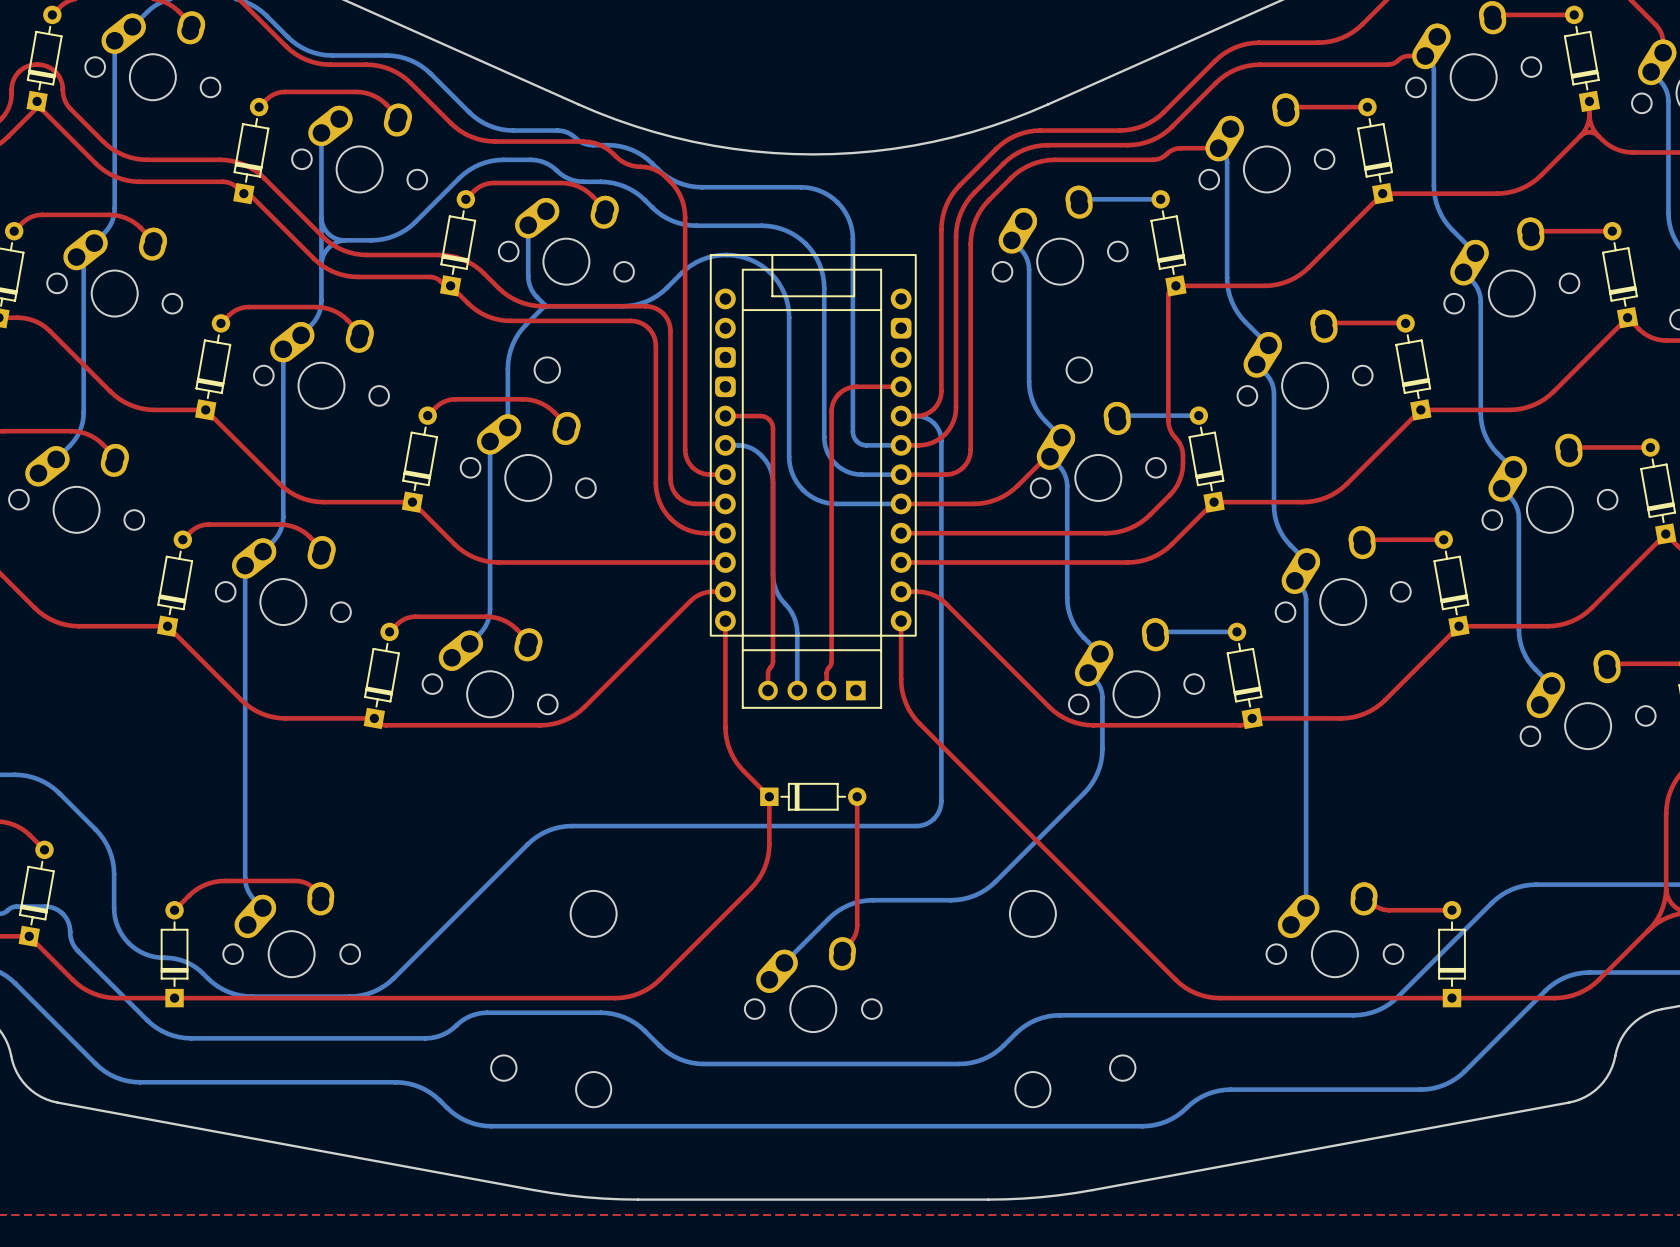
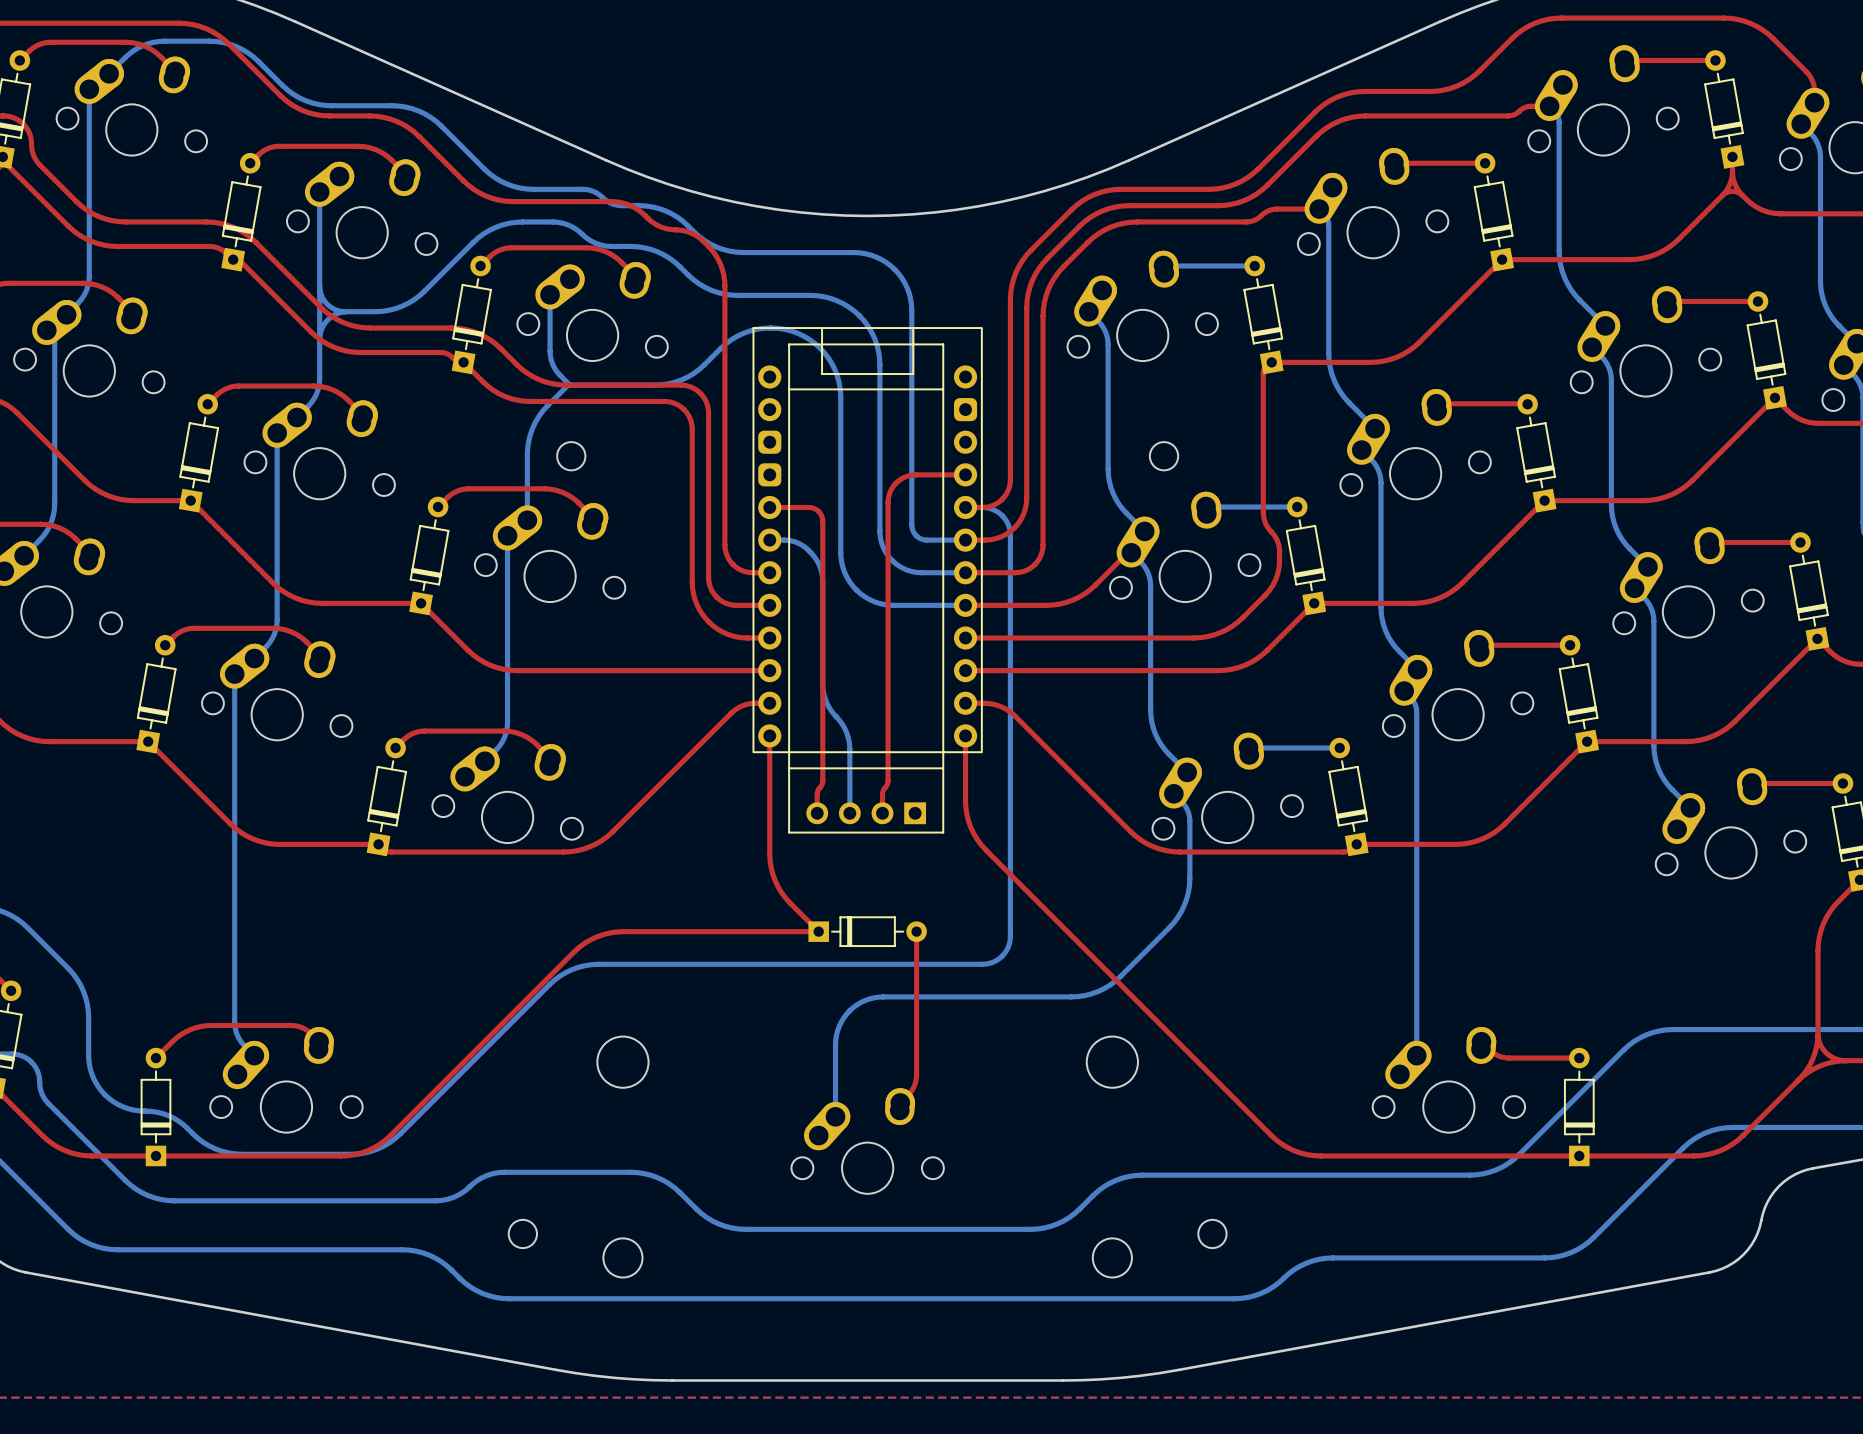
top track: (769, 796) (769, 850) (766, 862) (758, 879) (659, 979) (639, 993) (615, 998) (340, 998) -> (818, 931) (623, 931) (596, 936) (573, 952) (385, 1140) (361, 1152) (341, 1155)
bottom track: (1040, 836) (995, 881) (980, 892) (957, 899) (873, 900) (854, 902) (833, 914) (784, 962) -> (1120, 976) (1104, 988) (1078, 996) (883, 996) (860, 1002) (843, 1018) (836, 1035) (835, 1116)

